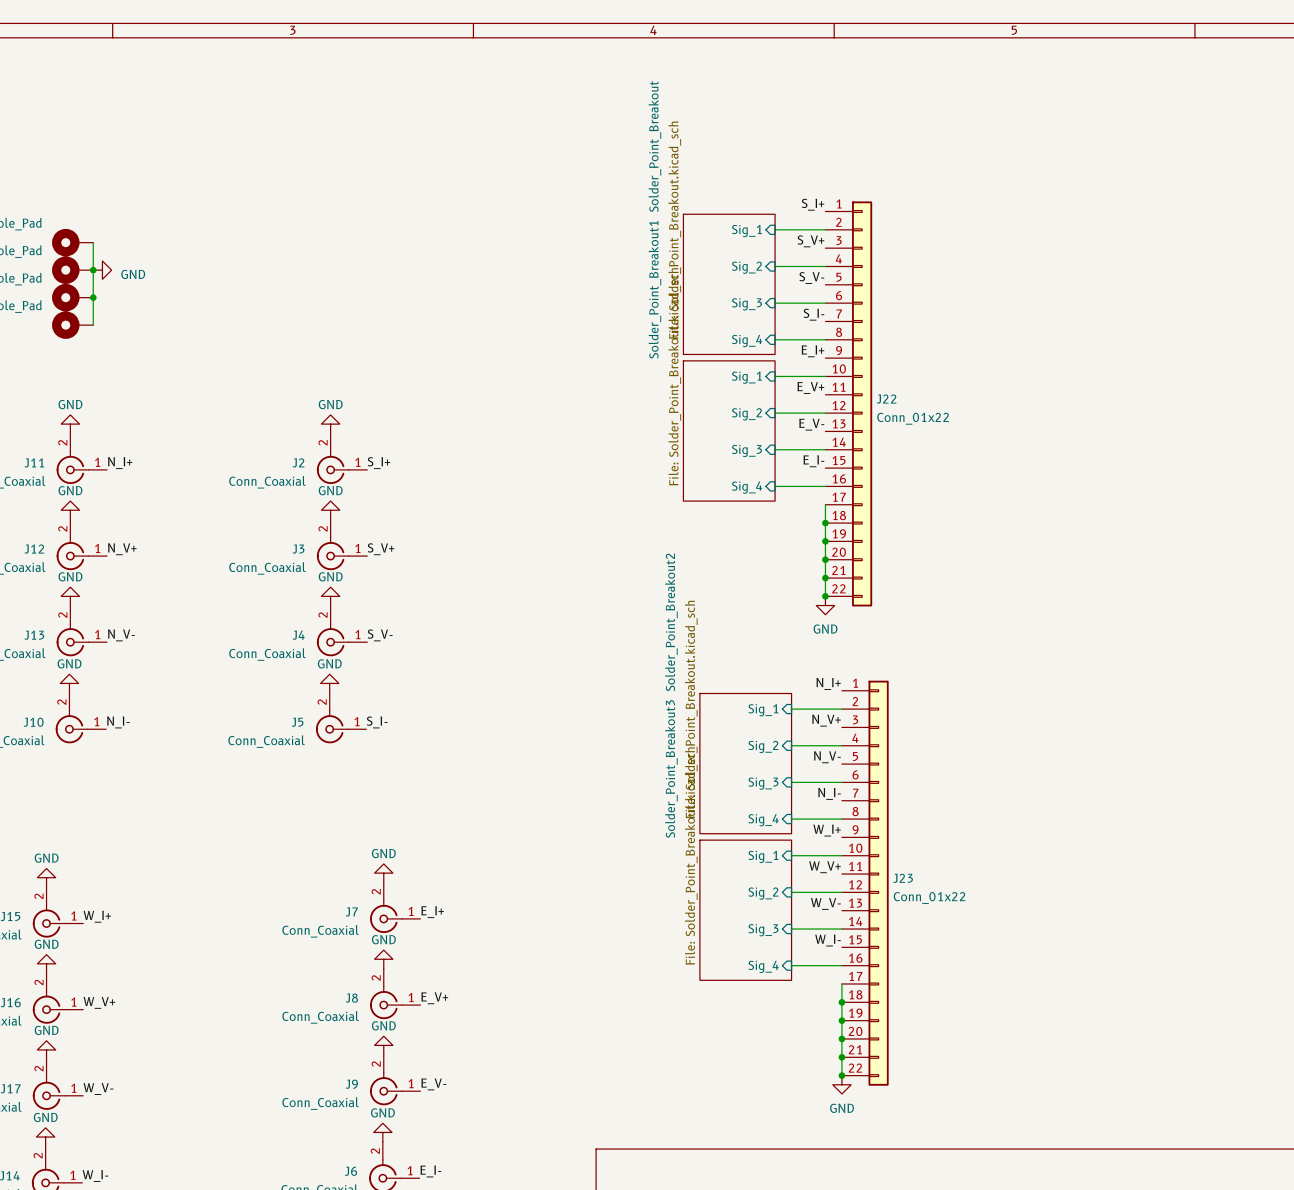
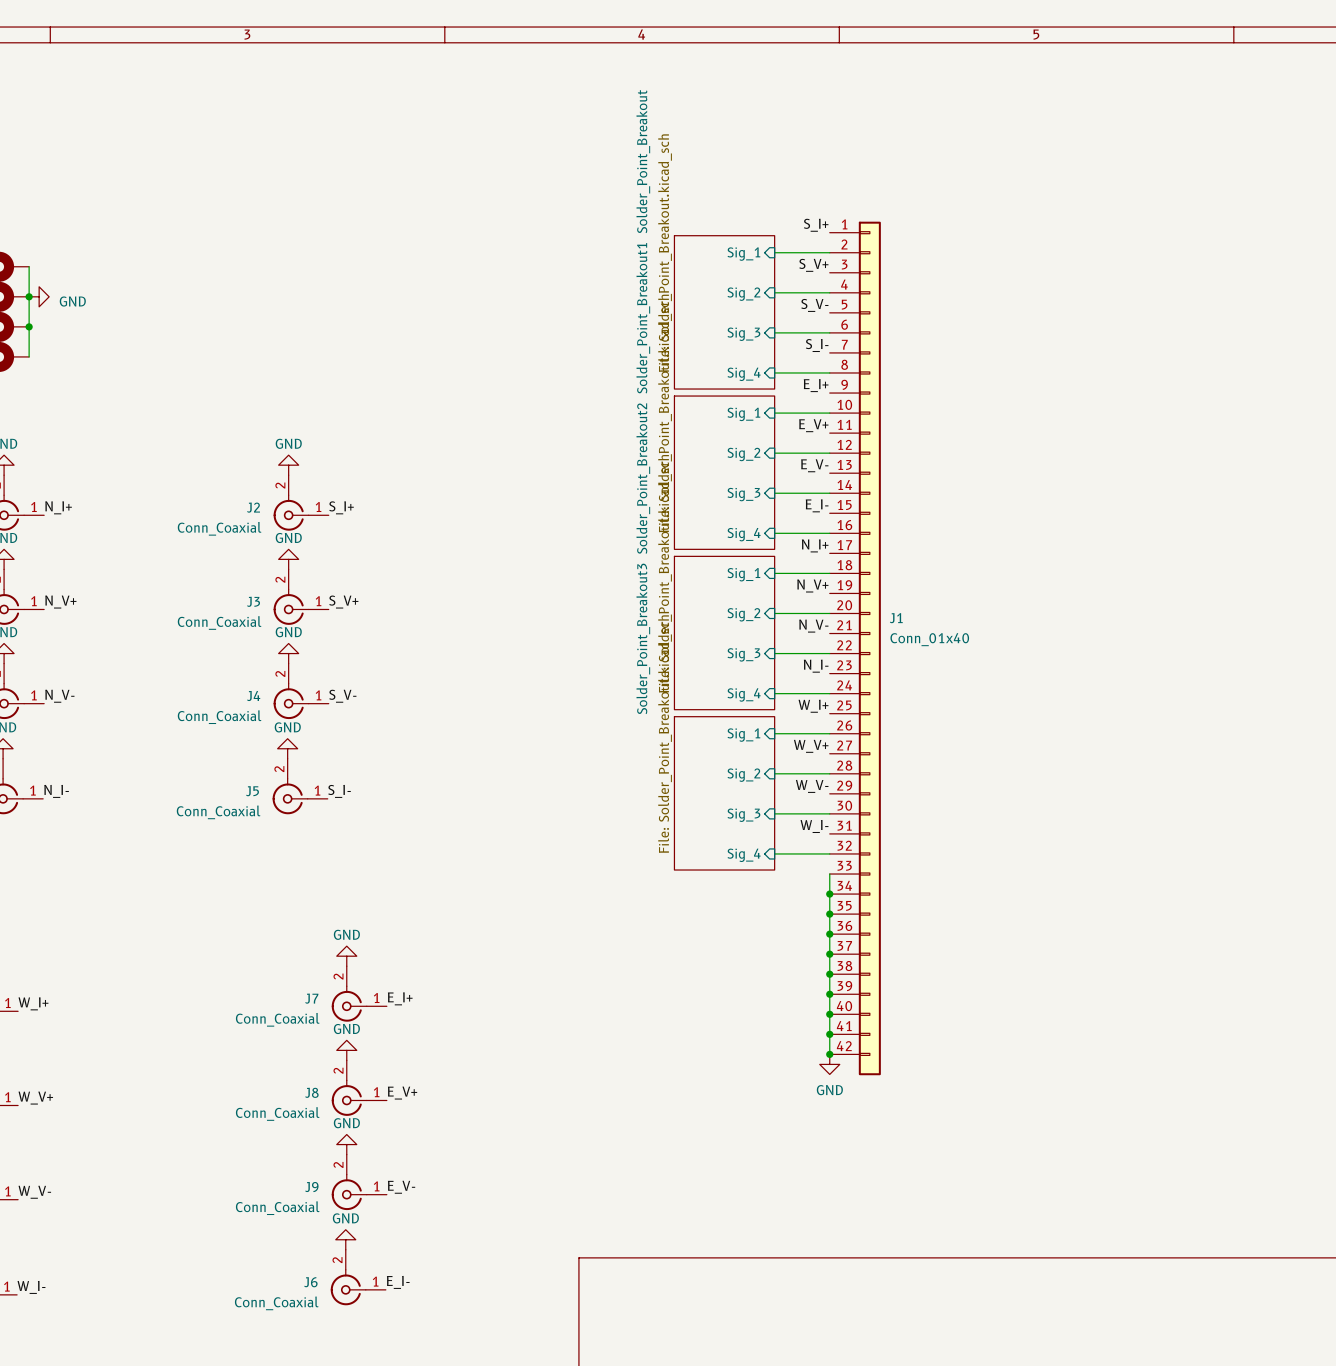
J22: Conn_01x22 (848, 403) -> none
label: none -> N_I+ (815, 545)
wire: (825, 504) (825, 596) -> (774, 653) (829, 653)
wire: none -> (774, 573) (829, 573)
junction: (825, 523) -> none
sheet pin: none -> Sig_1 (743, 574)
label: none -> N_V+ (812, 585)
junction: (825, 541) -> none
junction: (825, 559) -> none
sheet pin: none -> Sig_2 (743, 614)
label: none -> N_V- (813, 626)
junction: (825, 578) -> none
J1: none -> Conn_01x40 (855, 648)
junction: (825, 596) -> none
sheet pin: none -> Sig_3 (743, 654)
power symbol: GND (825, 605) -> none
label: none -> N_I- (816, 666)
sheet pin: none -> Sig_4 (744, 694)
label: none -> W_I+ (813, 706)
label: none -> W_V+ (811, 746)
label: N_I+ (828, 683) -> none
wire: (791, 709) (841, 709) -> (774, 613) (829, 613)
sheet pin position: Sig_1 (763, 710) -> Sig_1 (743, 735)
label: none -> W_V- (812, 786)
label: N_V+ (826, 720) -> none
wire: (791, 745) (841, 745) -> none
sheet pin position: Sig_2 (763, 746) -> Sig_2 (743, 775)
label: none -> W_I- (814, 826)
label: N_V- (827, 757) -> none
sheet Solder_Point_Breakout2 position: (745, 763) -> (724, 633)
wire: (791, 782) (841, 782) -> (774, 693) (829, 693)
sheet pin position: Sig_3 (763, 783) -> Sig_3 (743, 815)
label: N_I- (829, 793) -> none
wire: none -> (829, 874) (829, 1054)
junction: none -> (829, 894)
wire: (791, 819) (841, 819) -> (774, 733) (829, 733)
sheet pin position: Sig_4 (763, 820) -> Sig_4 (744, 855)
label: W_I+ (827, 830) -> none
junction: none -> (829, 914)
junction: none -> (829, 934)
wire: (791, 855) (841, 855) -> (774, 773) (829, 773)
sheet pin: Sig_1 (763, 856) -> none
label: W_V+ (824, 867) -> none
junction: none -> (829, 954)
J23: Conn_01x22 (865, 883) -> none
junction: none -> (829, 974)
wire: (791, 892) (841, 892) -> (774, 813) (829, 813)
sheet pin: Sig_2 (763, 893) -> none
label: W_V- (825, 903) -> none
junction: none -> (829, 994)
sheet Solder_Point_Breakout3 position: (745, 910) -> (724, 793)
junction: none -> (829, 1014)
wire: (791, 929) (841, 929) -> (774, 853) (829, 853)
sheet pin: Sig_3 (763, 930) -> none
label: W_I- (827, 940) -> none
junction: none -> (829, 1034)
junction: none -> (829, 1054)
wire: (791, 965) (841, 965) -> none
sheet pin: Sig_4 (763, 966) -> none
wire: (841, 984) (841, 1075) -> none
junction: (841, 1002) -> none
junction: (841, 1020) -> none
junction: (841, 1038) -> none
junction: (841, 1057) -> none
junction: (841, 1075) -> none
power symbol position: GND (841, 1084) -> GND (829, 1064)

